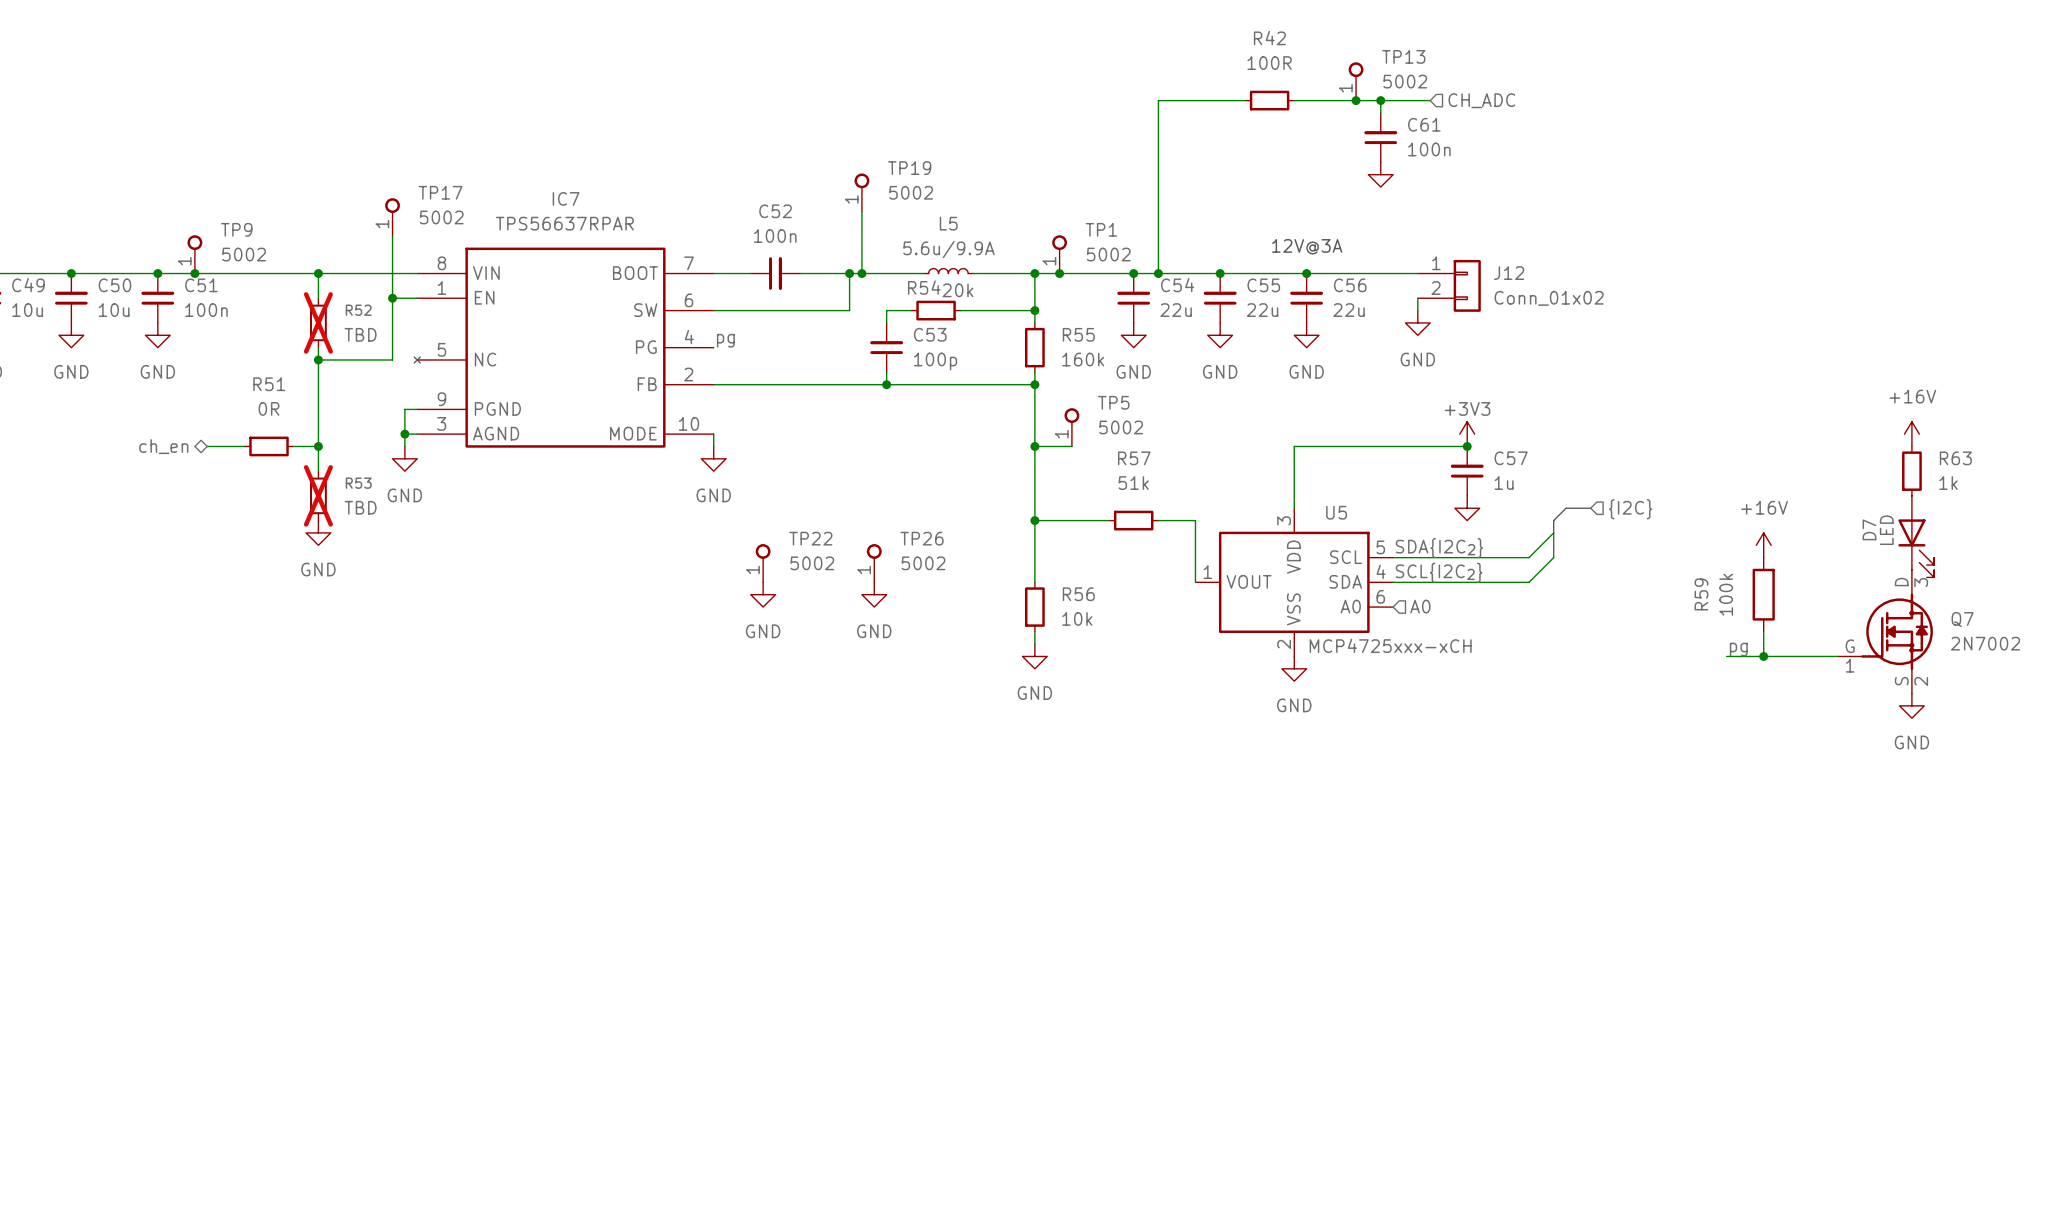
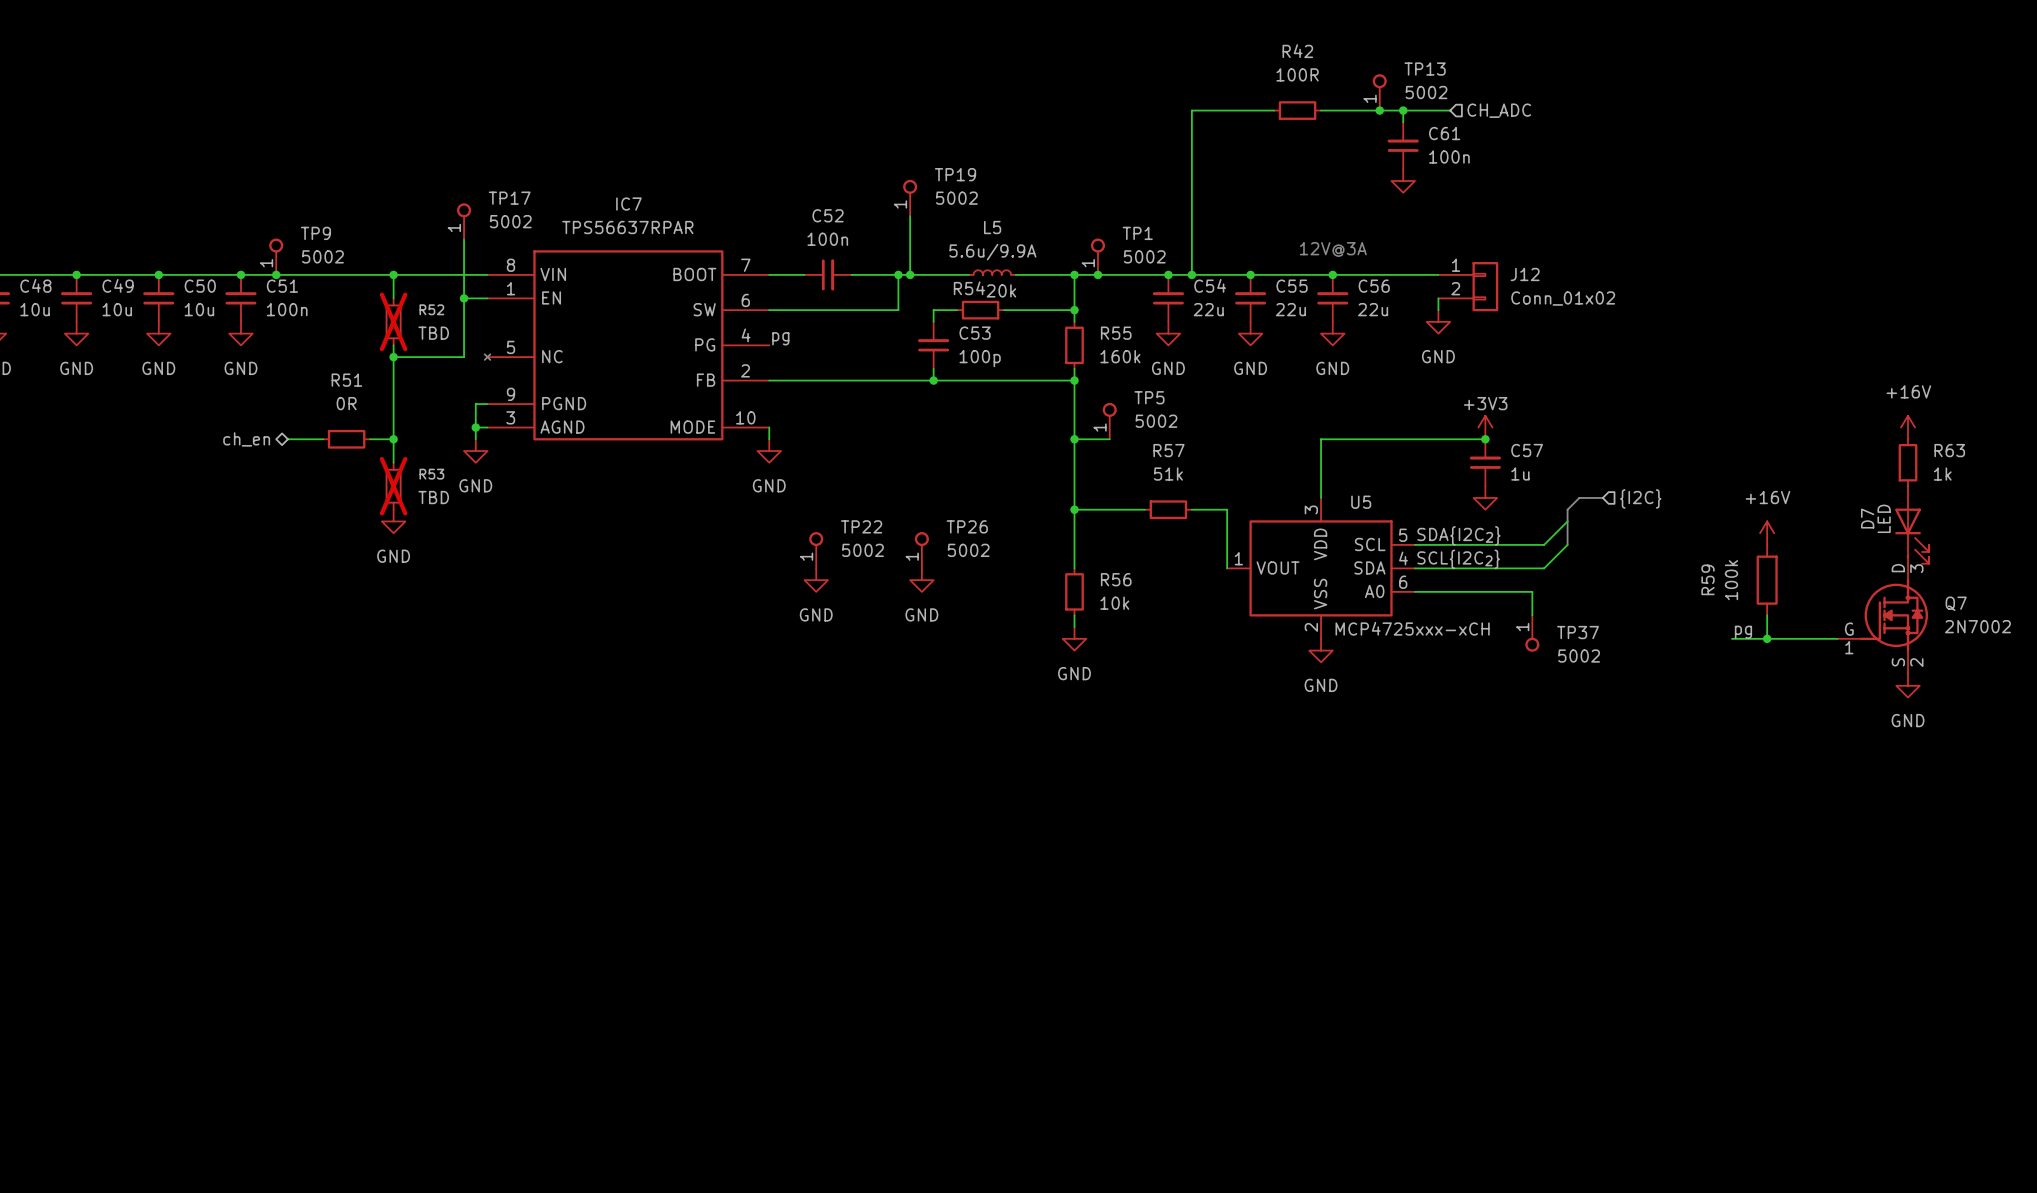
hierarchical label: A0 (1420, 606) -> none
wire: none -> (1414, 591) (1532, 591) (1532, 615)
TP37: none -> (1532, 633)

